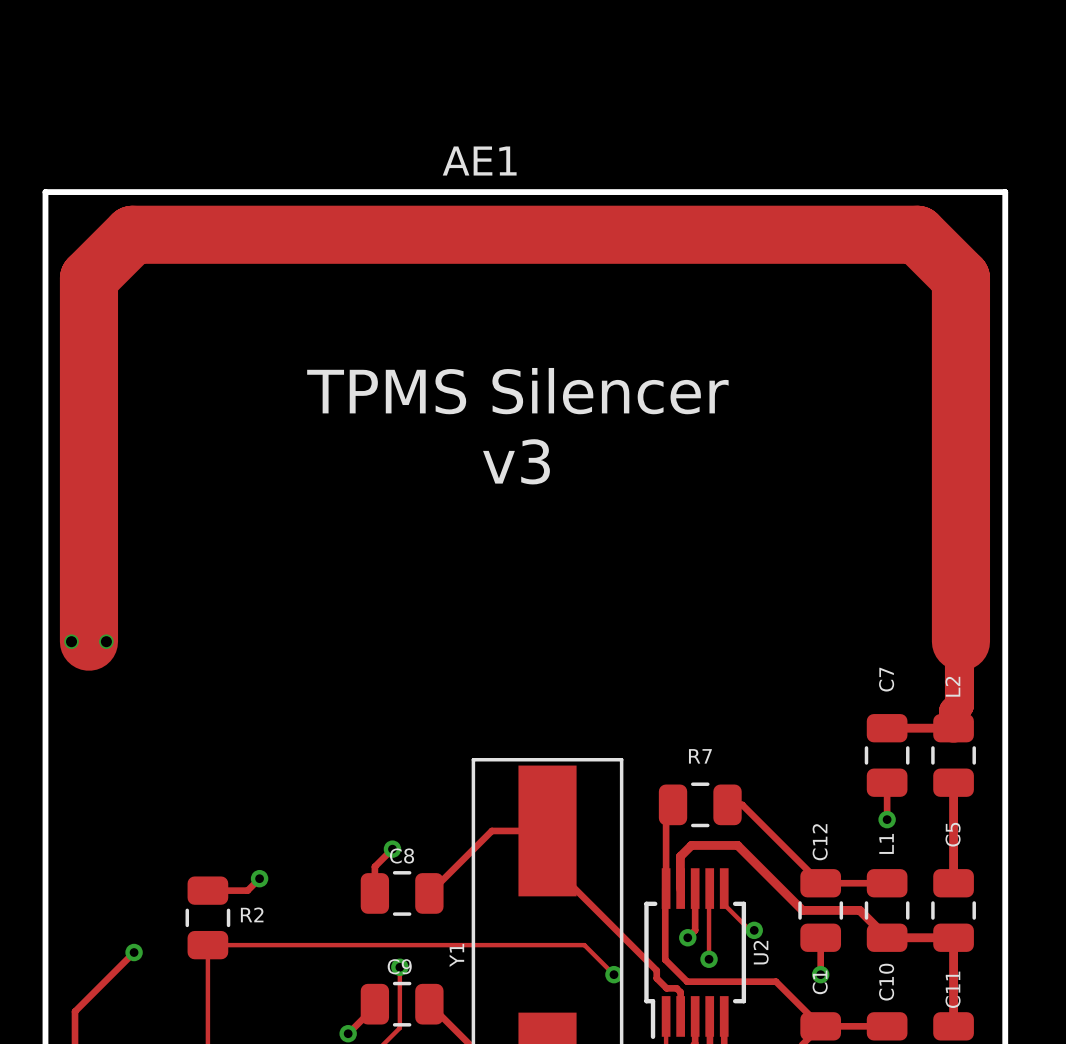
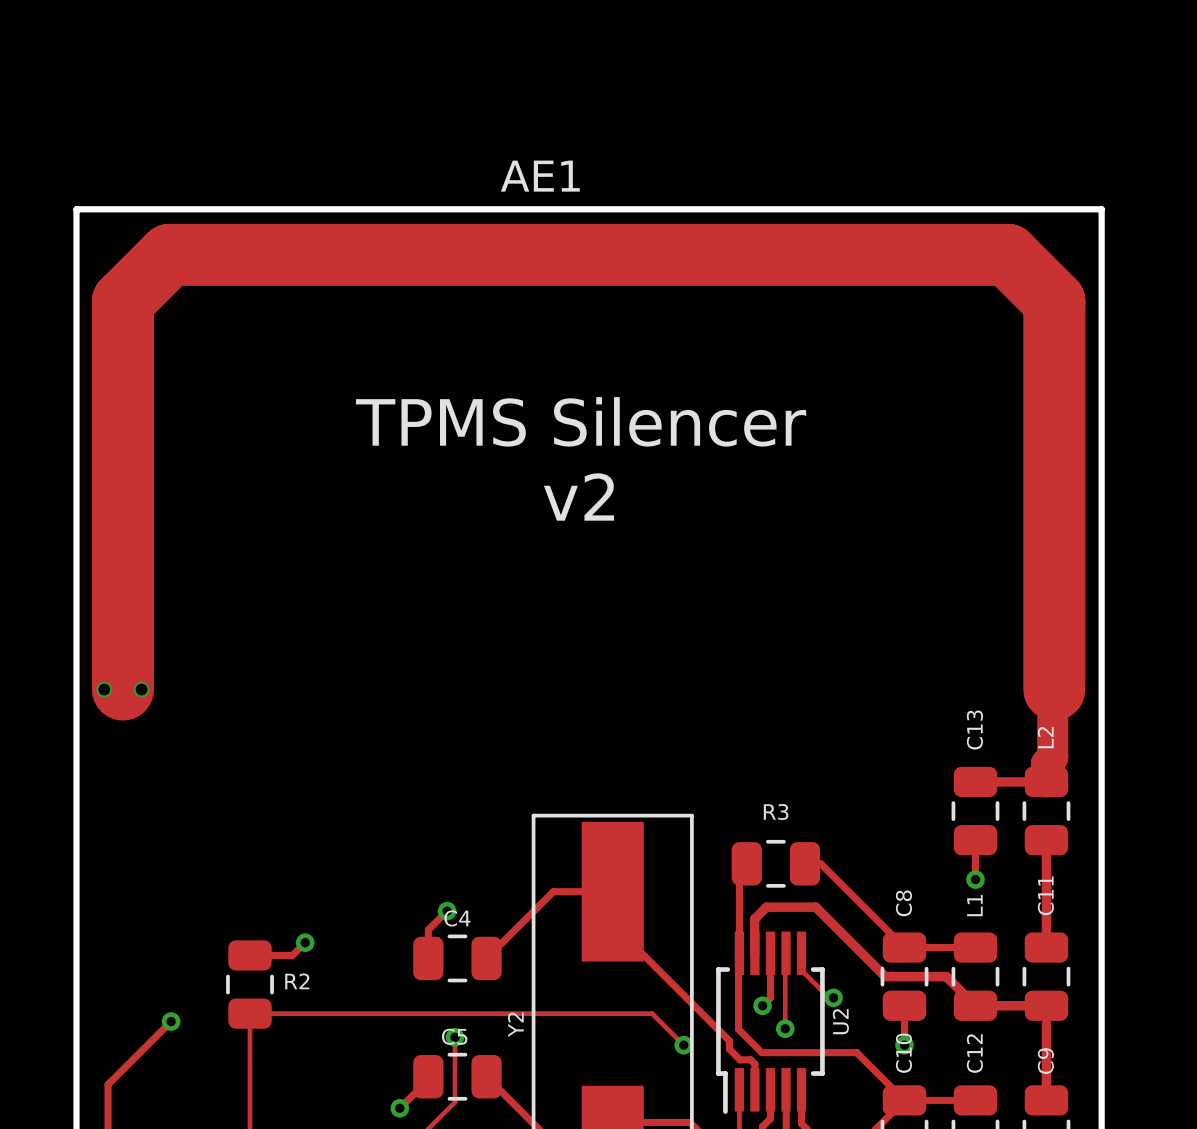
text: v3 (516, 461) -> v2 (578, 496)
C7 name: C7 (886, 679) -> C13 (974, 730)
R7 name: R7 (700, 756) -> R3 (776, 812)
C5 name: C5 (953, 834) -> C11 (1045, 895)
C12 name: C12 (820, 842) -> C8 (903, 903)
C8 name: C8 (402, 856) -> C4 (457, 918)
Y1 name: Y1 (456, 955) -> Y2 (515, 1024)
C9 name: C9 (399, 966) -> C5 (454, 1036)
C1 name: C1 (820, 982) -> C10 (903, 1053)
C10 name: C10 (886, 982) -> C12 (974, 1053)
C11 name: C11 (953, 989) -> C9 (1045, 1061)

